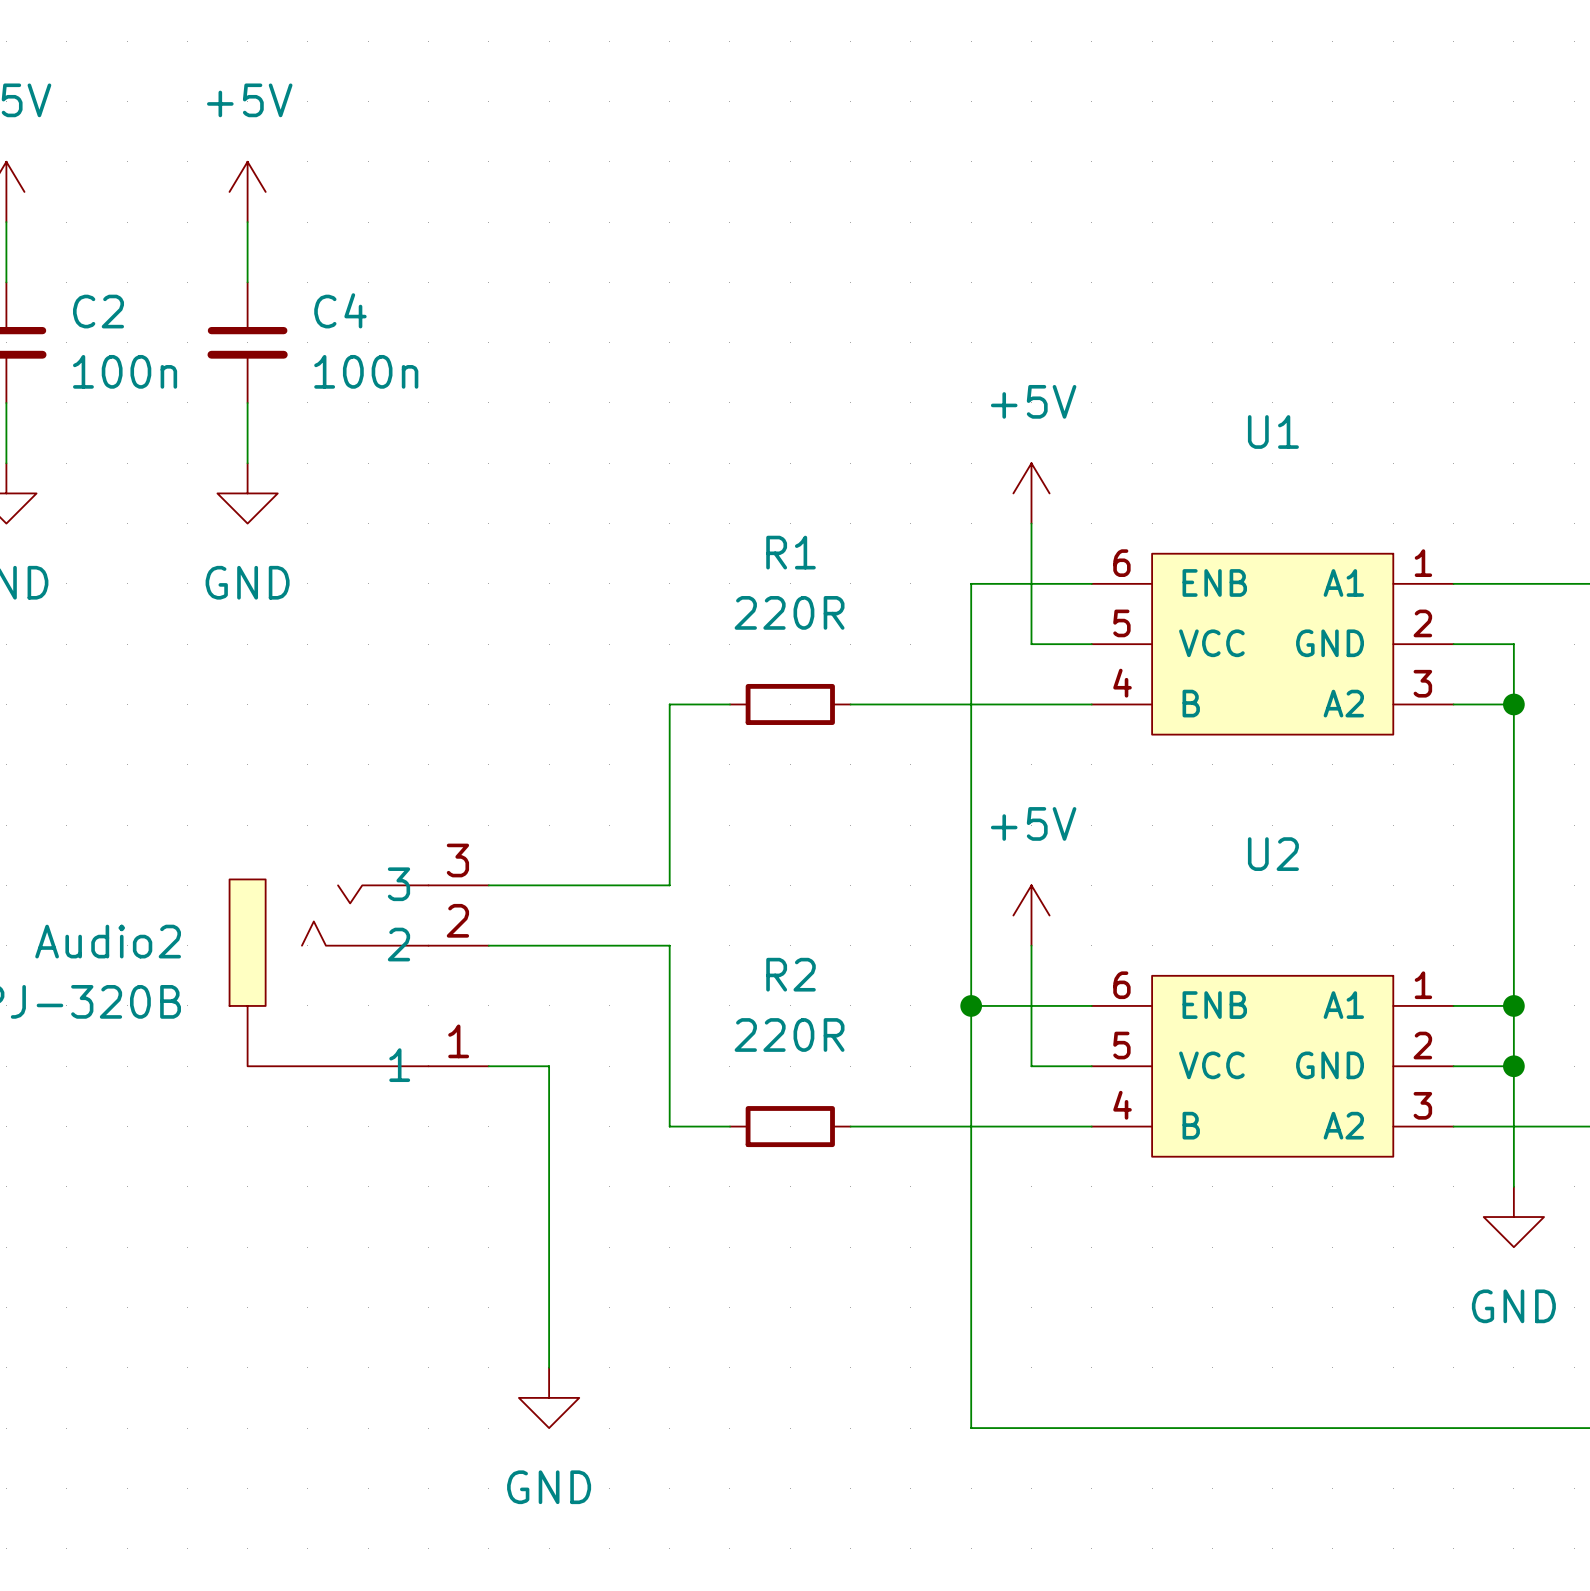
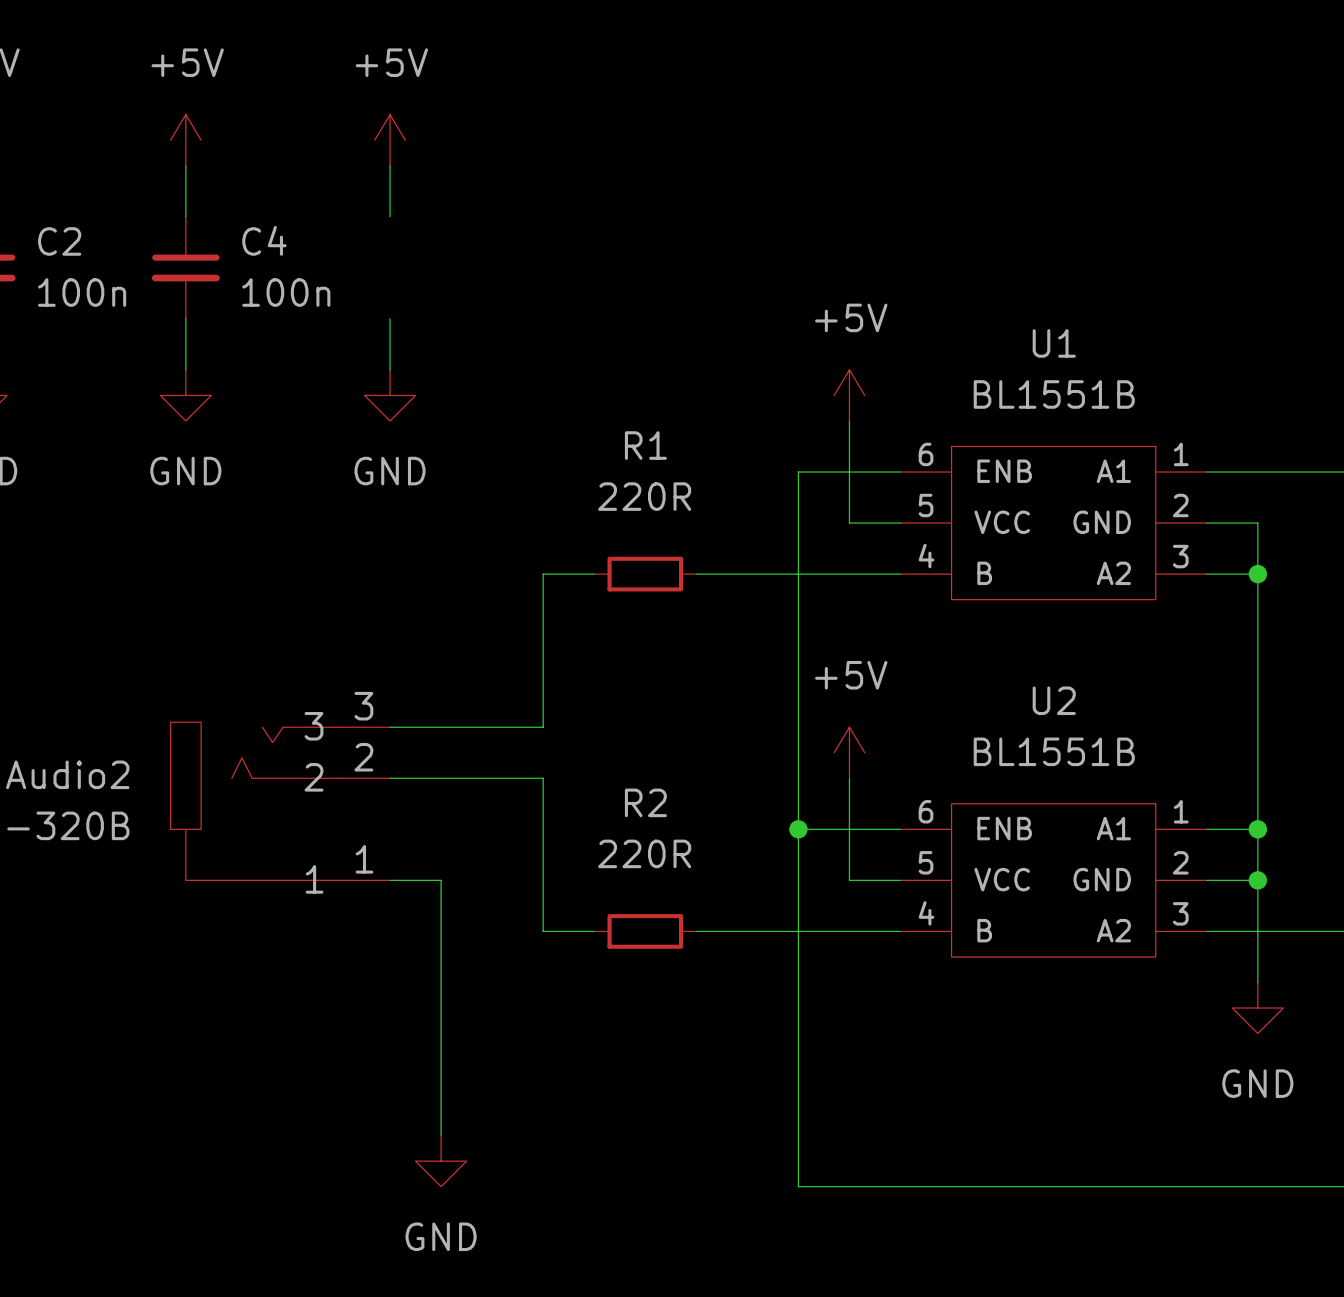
power symbol: none -> +5V (390, 140)
wire: none -> (390, 165) (390, 216)
wire: none -> (390, 318) (390, 369)
U1 value: none -> BL1551B (1054, 394)
power symbol: none -> GND (390, 395)
U2 value: none -> BL1551B (1054, 751)

